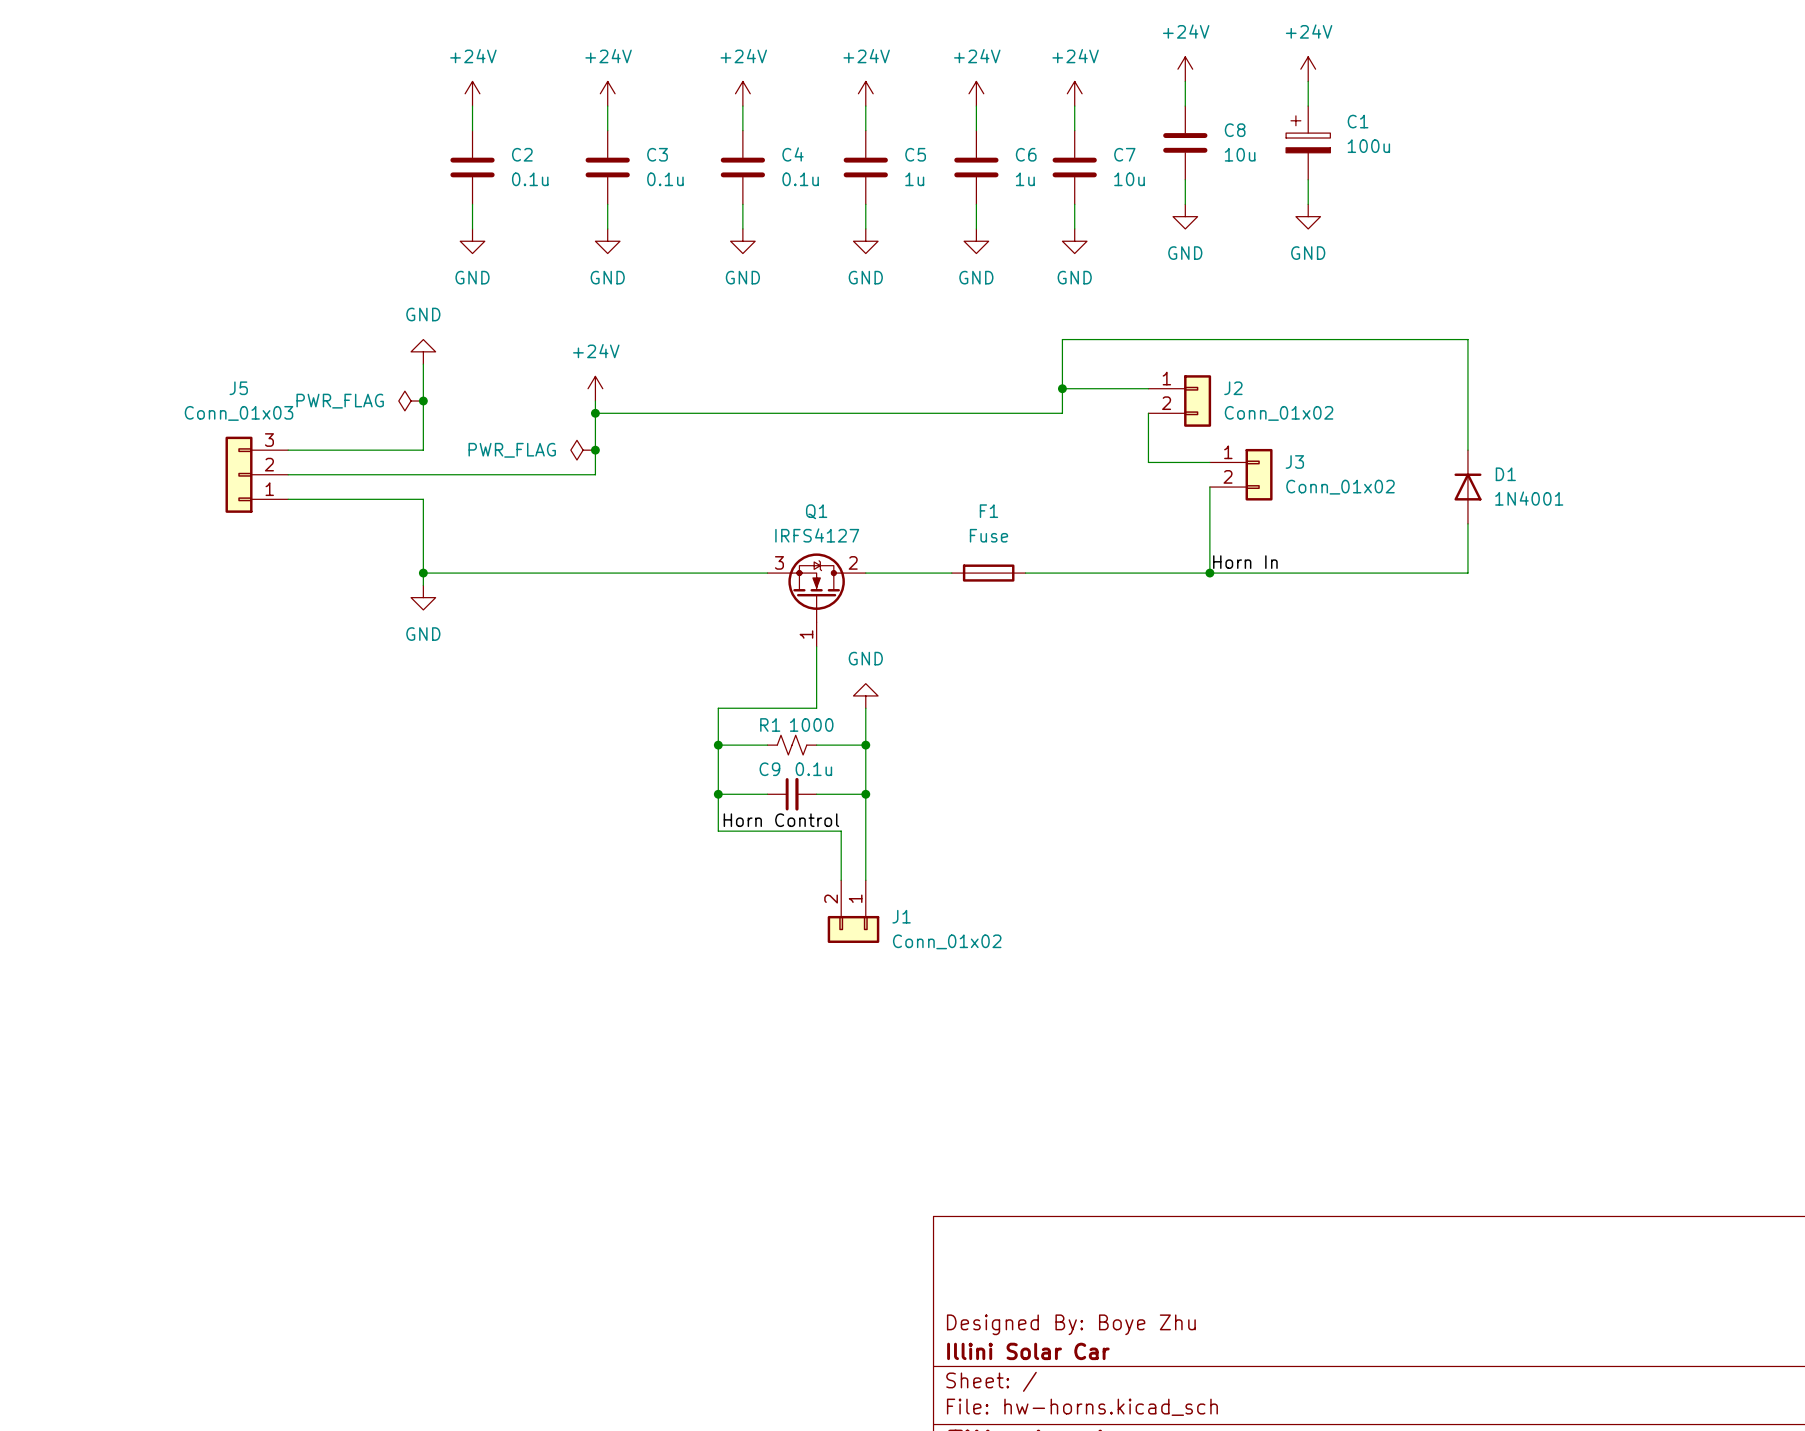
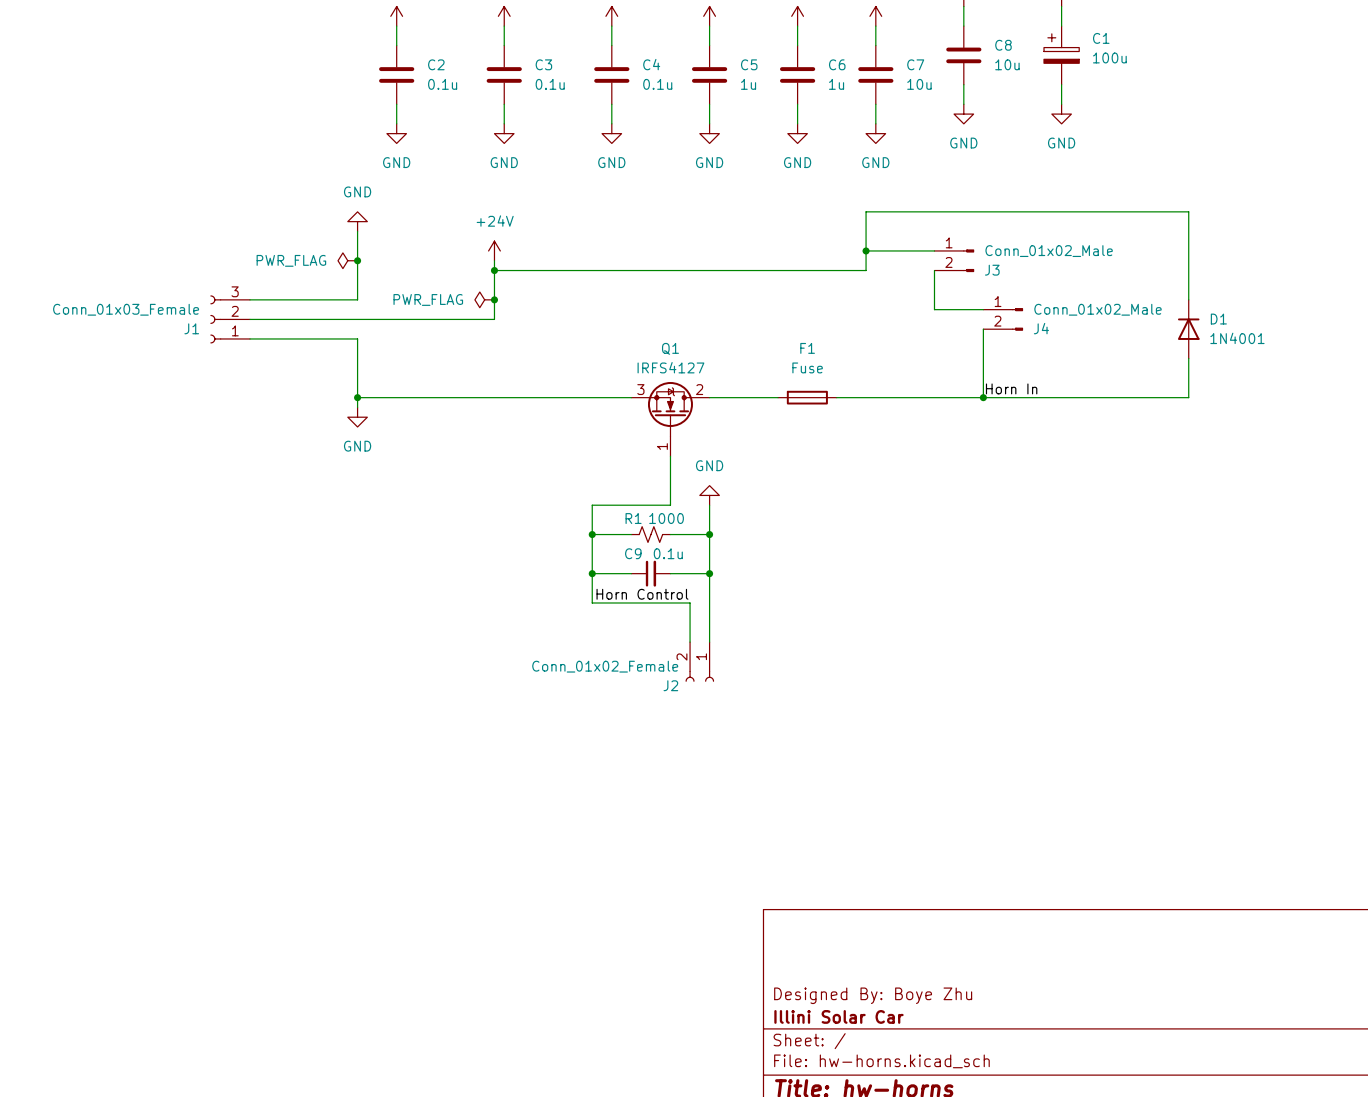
J2 symbol: [1148, 375, 1212, 427] -> [685, 642, 715, 682]
J2 name position: J2 (1233, 388) -> J2 (670, 685)
J2 value: Conn_01x02 (1279, 413) -> Conn_01x02_Female (605, 666)
J3 symbol: [1209, 448, 1273, 501] -> [934, 249, 975, 273]
J3 name position: J3 (1294, 461) -> J3 (992, 270)
J5: Conn_01x03 (256, 474) -> none
J4: none -> Conn_01x02_Male (1003, 319)
J3 value: Conn_01x02 (1340, 487) -> Conn_01x02_Male (1049, 251)
J1 symbol: [827, 880, 880, 943] -> [210, 295, 251, 344]
J1 name position: J1 (901, 916) -> J1 (191, 328)
J1 value: Conn_01x02 (947, 941) -> Conn_01x03_Female (126, 309)

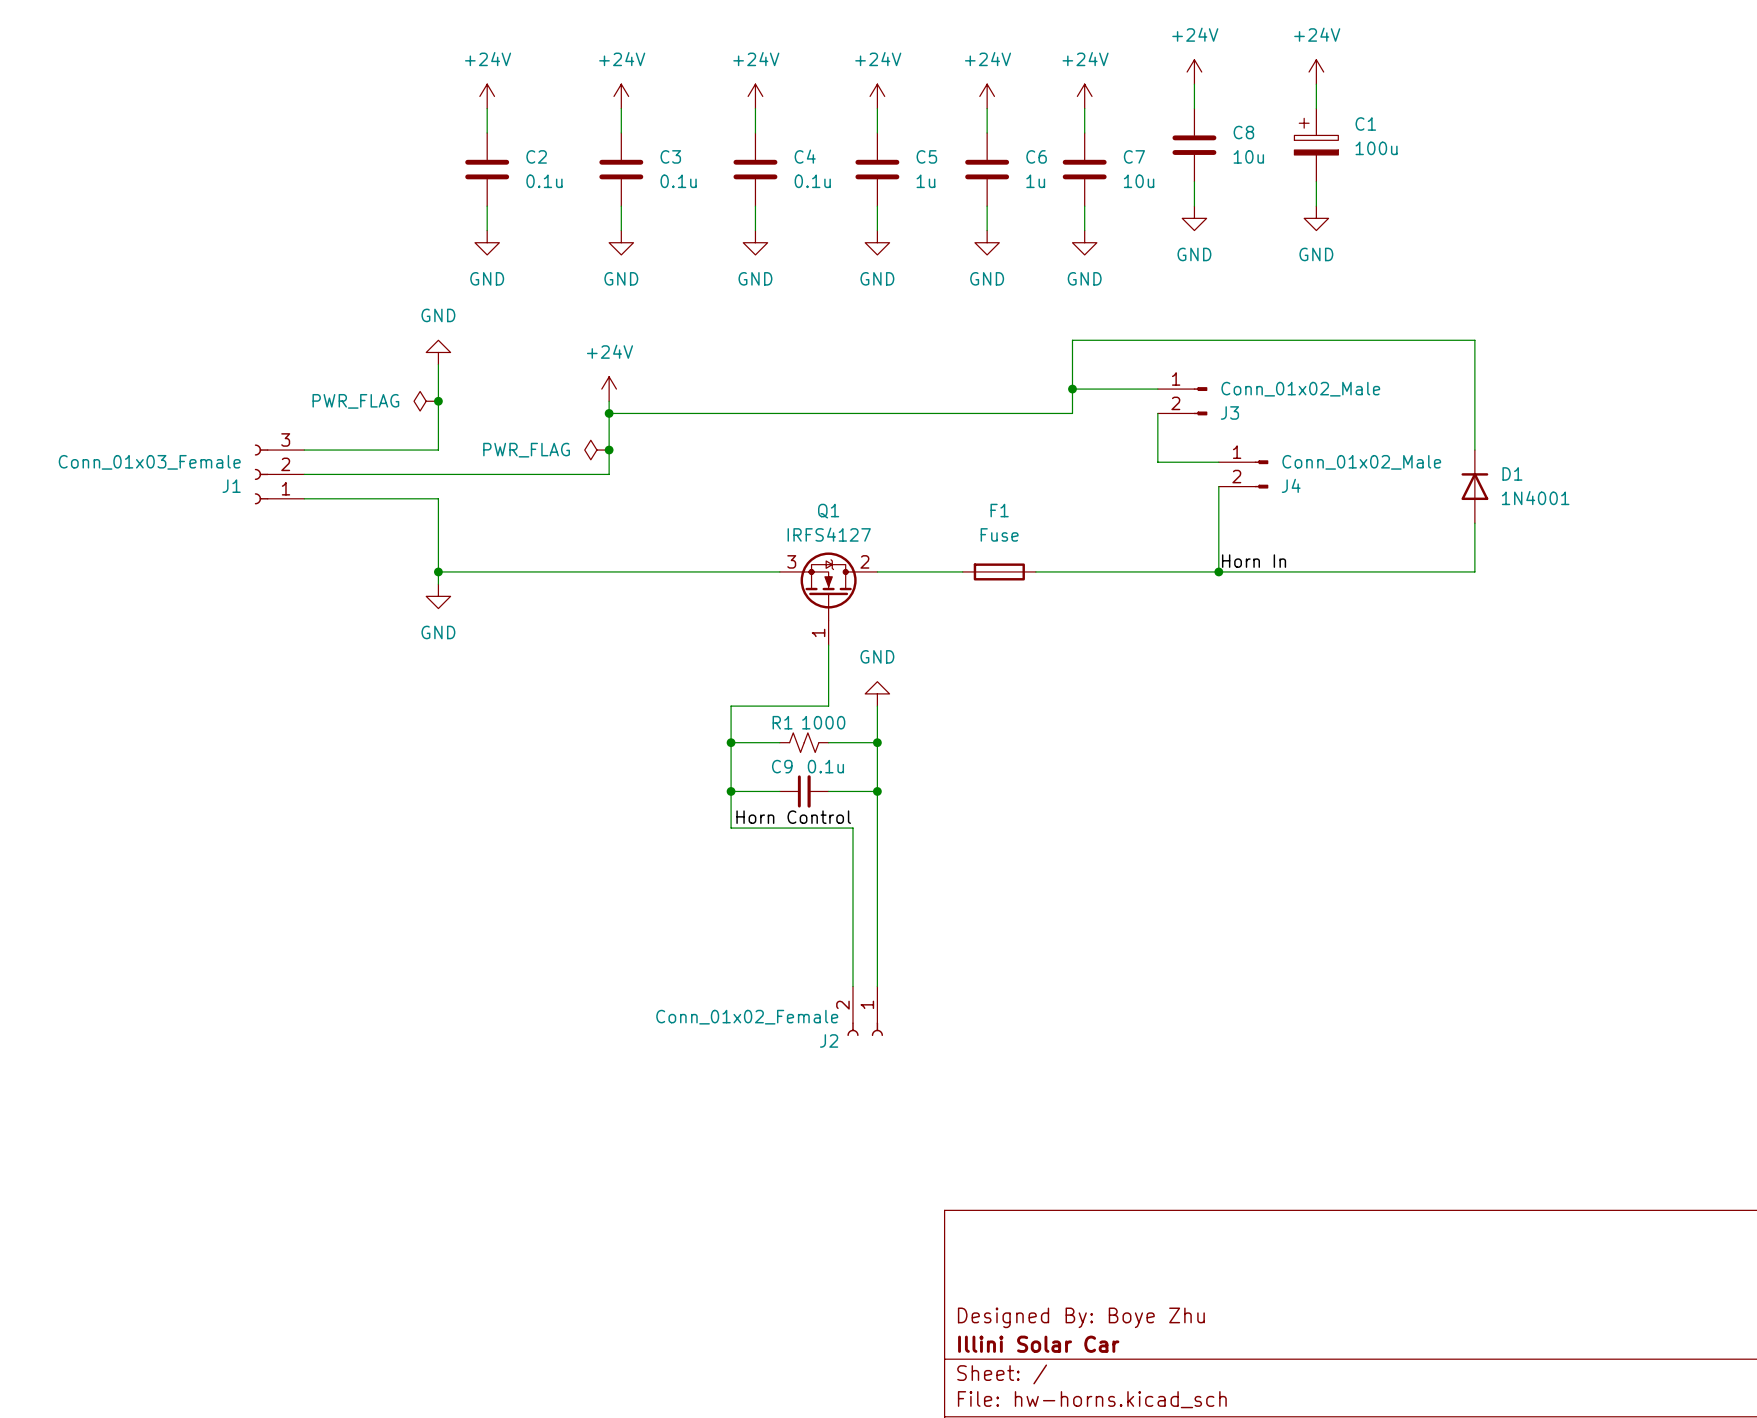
wire: none -> (853, 876) (853, 986)
wire: none -> (877, 876) (877, 986)
J2 position: (699, 661) -> (865, 1011)

